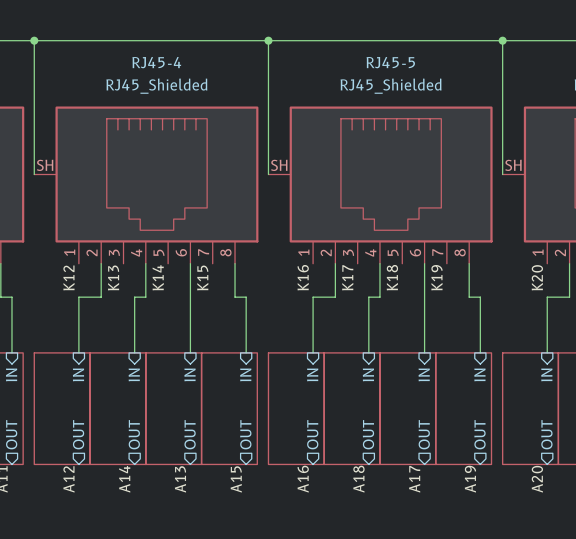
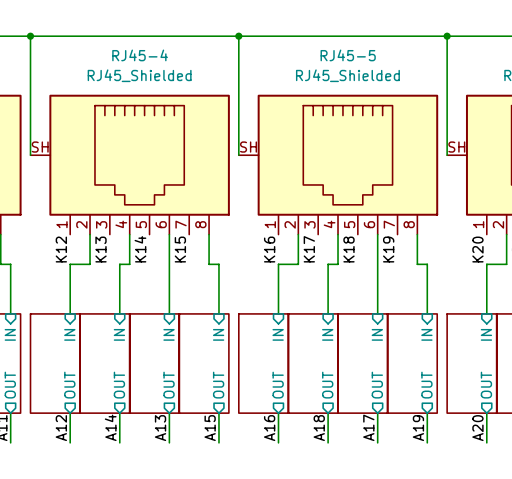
wire: none -> (10, 413) (10, 442)
wire: none -> (70, 413) (70, 442)
wire: none -> (119, 413) (119, 442)
wire: none -> (169, 413) (169, 442)
wire: none -> (218, 413) (218, 442)
wire: none -> (278, 413) (278, 442)
wire: none -> (328, 413) (328, 442)
wire: none -> (377, 413) (377, 442)
wire: none -> (427, 413) (427, 442)
wire: none -> (486, 413) (486, 442)

